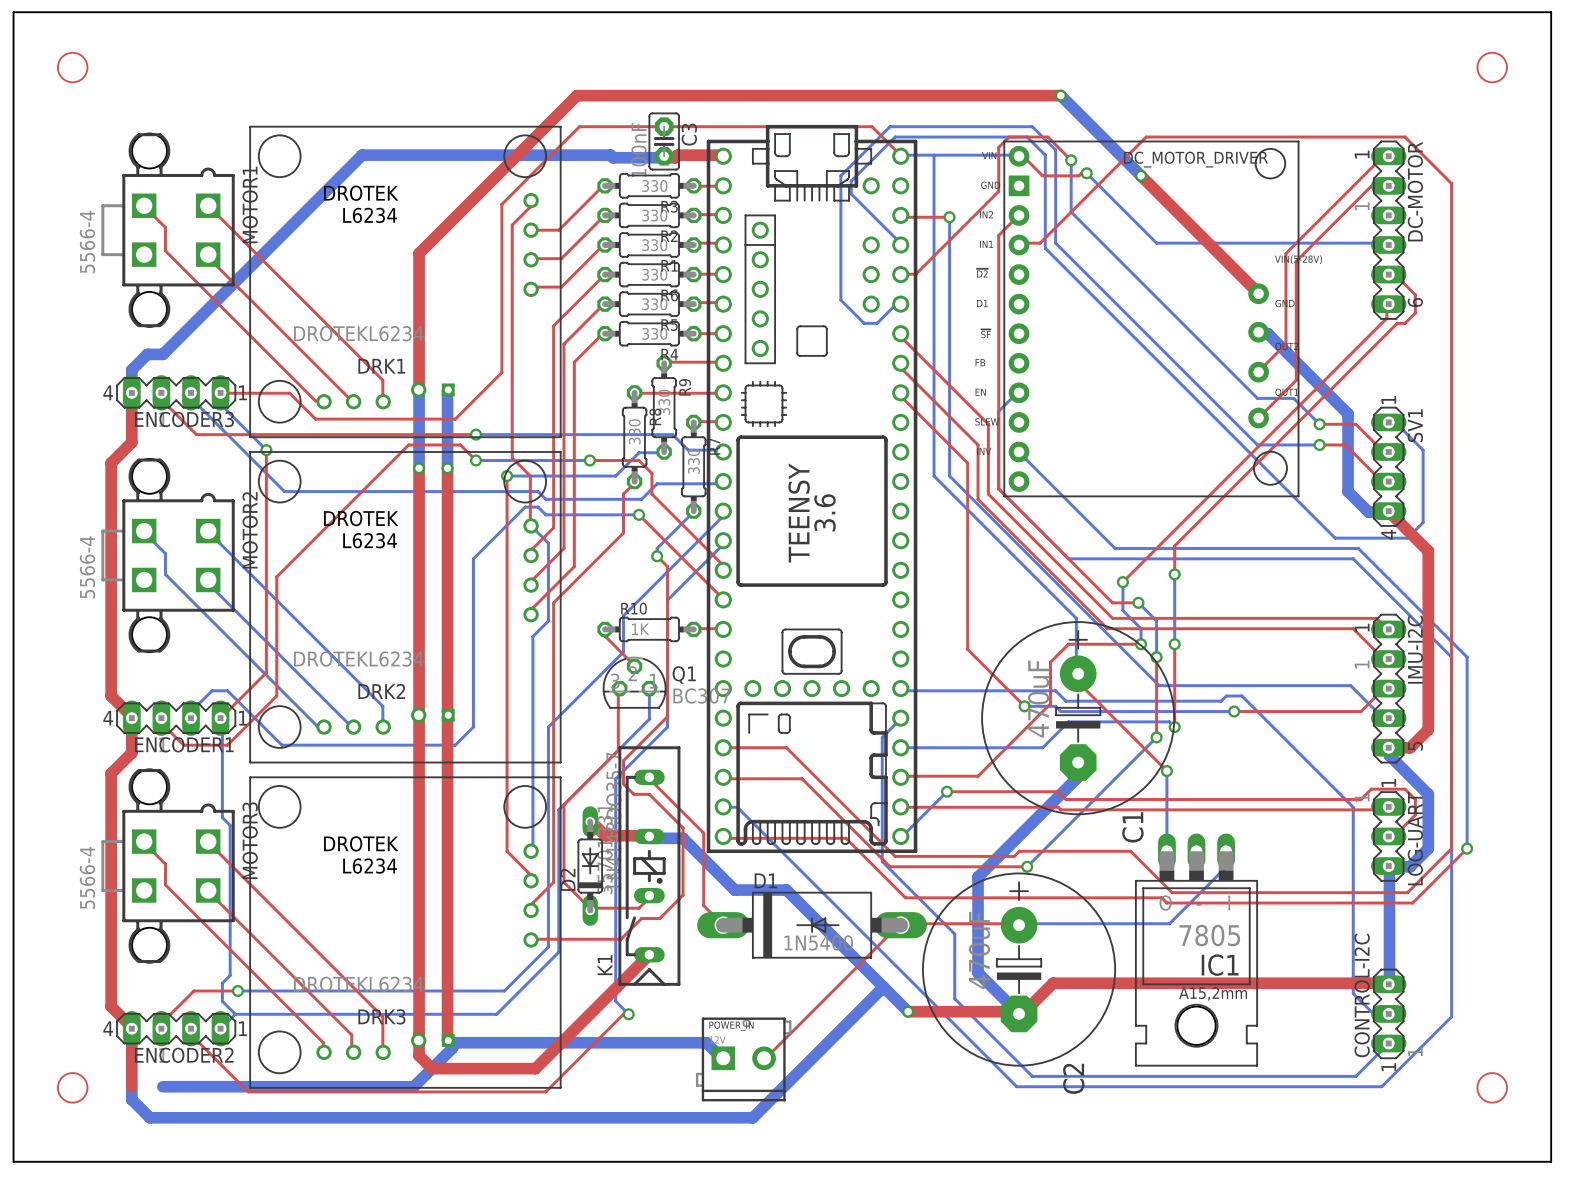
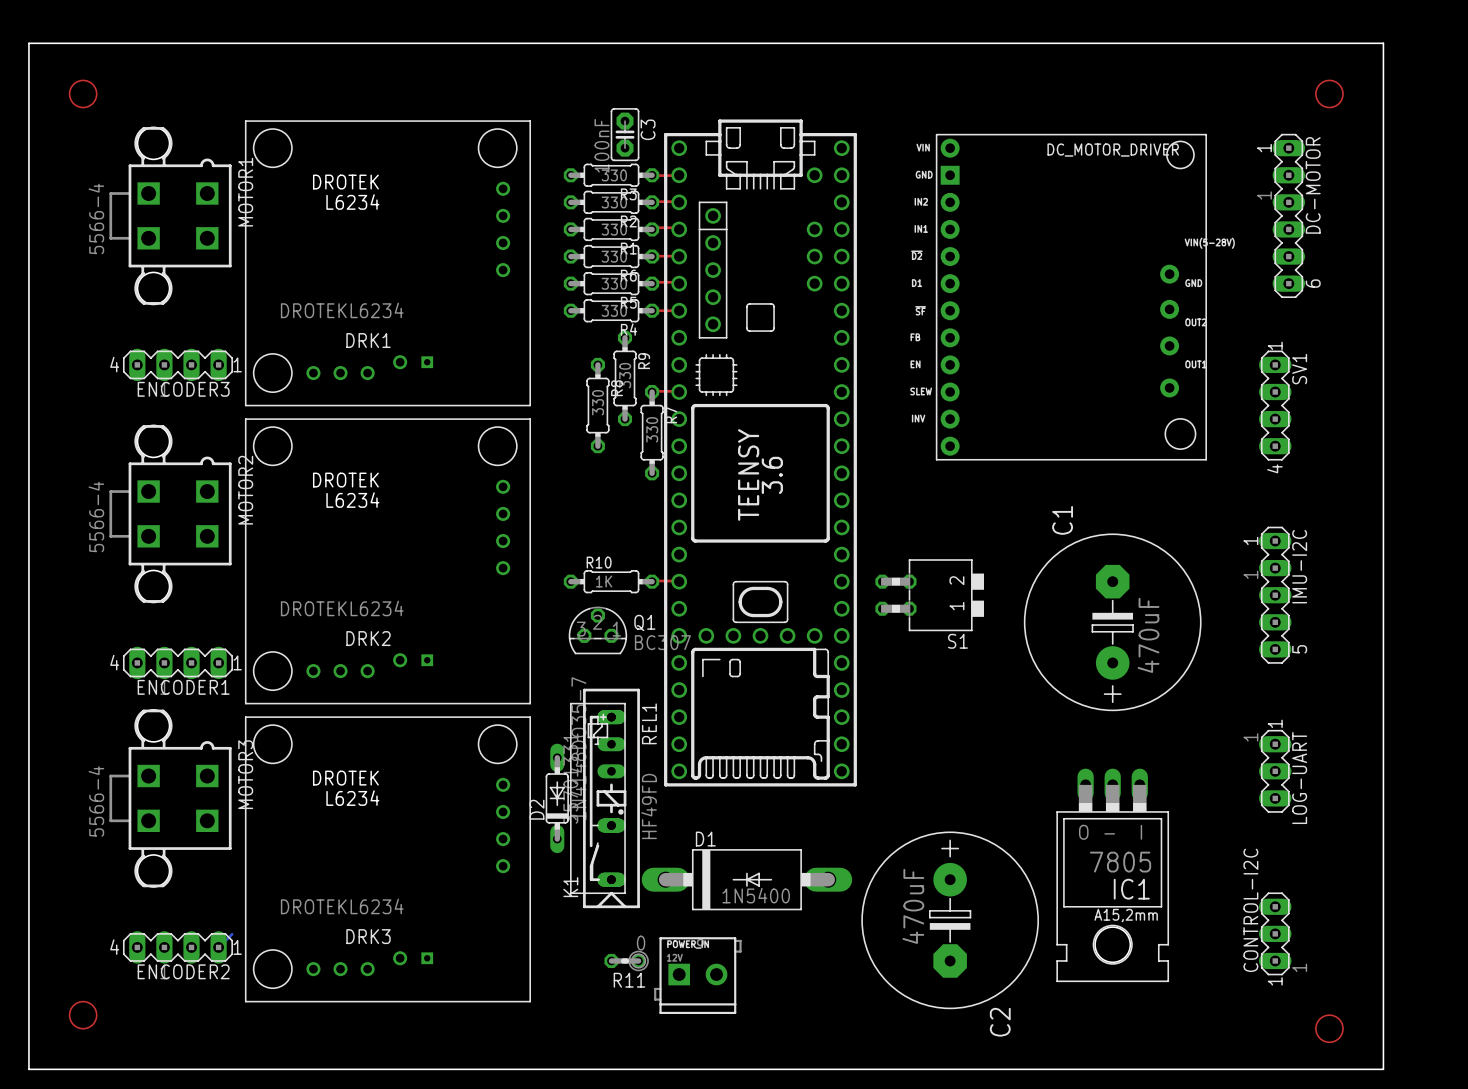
board edge: (13, 41) (13, 12) (1551, 12) (1551, 1161) (1492, 1161) -> (28, 43) (1383, 43) (1383, 1069)
drawing position: (72, 67) -> (83, 93)
drawing position: (1492, 67) -> (1329, 93)
bottom track: (1060, 95) (1141, 175) -> none
top track: (1060, 95) (576, 95) (419, 253) (418, 389) -> none
via: (1060, 95) -> none
bottom track: (934, 155) (934, 476) (1076, 618) (1076, 672) (1078, 673) -> none
bottom track: (664, 156) (613, 157) (610, 155) (362, 155) (162, 354) (147, 354) (131, 369) (131, 392) -> none
top track: (664, 156) (723, 156) -> none
bottom track: (900, 156) (1019, 156) -> none
top track: (900, 156) (871, 126) (579, 126) (501, 204) (501, 372) (455, 419) (315, 419) (289, 393) (220, 392) -> none
top track: (1019, 156) (1024, 157) (1042, 175) (1078, 175) (1081, 173) (1086, 173) -> none
top track: (1388, 156) (1381, 157) (1285, 253) (1285, 344) (1258, 372) -> none
bottom track: (1071, 160) (1071, 212) (1257, 398) (1293, 398) (1319, 424) -> none
top track: (1071, 160) (1047, 137) (1009, 137) (998, 147) (998, 191) (915, 274) (900, 274) -> none
via: (1071, 160) -> none
bottom track: (1086, 173) (1156, 243) (1386, 243) (1388, 244) -> none
via: (1086, 173) -> none
top track: (1141, 175) (1258, 293) -> none
via: (1141, 175) -> none
top track: (605, 185) (558, 230) (531, 230) -> none
top track: (1388, 185) (1371, 186) (1296, 261) (1296, 380) (1258, 417) -> none
top track: (531, 200) (530, 206) (512, 225) (512, 457) (530, 476) (531, 525) -> none
top track: (144, 205) (165, 227) (165, 250) (315, 400) (324, 401) -> none
top track: (208, 205) (382, 380) (383, 401) -> none
top track: (605, 215) (561, 258) (531, 259) -> none
top track: (900, 215) (902, 217) (949, 217) -> none
top track: (1019, 215) (998, 235) (998, 488) (1112, 602) (1138, 602) -> none
bottom track: (949, 217) (949, 476) (1159, 685) (1350, 685) (1381, 716) (1388, 718) -> none
via: (949, 217) -> none
top track: (605, 244) (561, 287) (532, 287) (531, 289) -> none
bottom track: (900, 244) (851, 193) (851, 181) (895, 137) (1027, 137) (1045, 155) (1045, 248) (1335, 538) (1407, 538) (1423, 522) (1423, 450) (1397, 424) (1389, 424) (1388, 422) -> none
top track: (1019, 244) (1019, 243) (1040, 243) (1146, 137) (1405, 137) (1451, 183) (1451, 848) (1407, 892) (1172, 892) (1130, 851) (1019, 851) (1014, 856) (895, 856) (786, 747) (723, 747) -> none
top track: (208, 254) (206, 256) (353, 401) -> none
top track: (605, 274) (553, 325) (553, 527) (532, 548) (531, 555) -> none
top track: (1388, 274) (1389, 276) (1397, 276) (1415, 294) (1415, 313) (1405, 323) (1397, 323) (1174, 545) (1174, 574) -> none
top track: (605, 304) (563, 344) (563, 548) (532, 579) (532, 584) (531, 585) -> none
bottom track: (900, 304) (895, 305) (877, 323) (864, 323) (840, 300) (840, 175) (890, 126) (1032, 126) (1055, 149) (1055, 243) (1257, 444) (1319, 444) -> none
top track: (1388, 304) (1386, 305) (1386, 318) (1122, 582) -> none
bottom track: (1258, 332) (1267, 333) (1348, 413) (1348, 491) (1368, 512) (1388, 511) -> none
top track: (605, 333) (602, 333) (574, 362) (574, 566) (532, 608) (531, 614) -> none
top track: (900, 333) (902, 333) (902, 338) (988, 424) (988, 494) (1112, 618) (1376, 618) (1388, 629) -> none
top track: (664, 363) (723, 363) -> none
top track: (900, 363) (902, 364) (902, 369) (978, 444) (978, 499) (1107, 628) (1353, 628) (1381, 657) (1388, 659) -> none
bottom track: (418, 389) (419, 468) -> none
bottom track: (448, 389) (447, 468) -> none
top track: (131, 392) (131, 442) (111, 463) (111, 695) (131, 718) (131, 752) (111, 773) (111, 1006) (131, 1028) (131, 1086) -> none
top track: (161, 392) (162, 400) (196, 434) (476, 434) -> none
bottom track: (190, 392) (191, 398) (284, 491) (538, 491) (545, 499) (641, 499) (657, 483) (721, 483) (723, 481) -> none
bottom track: (220, 392) (222, 393) (222, 406) (266, 450) -> none
top track: (634, 392) (723, 392) -> none
top track: (900, 392) (902, 393) (902, 398) (967, 463) (967, 649) (1024, 706) -> none
bottom track: (1019, 392) (998, 411) (998, 488) (1068, 558) (1353, 558) (1451, 657) (1451, 1016) (1381, 1086) (1016, 1086) (737, 807) (723, 806) -> none
top track: (1319, 424) (1355, 424) (1381, 450) (1388, 452) -> none
via: (1319, 424) -> none
bottom track: (476, 434) (672, 434) (688, 450) (721, 450) (723, 452) -> none
via: (476, 434) -> none
top track: (1319, 444) (1345, 444) (1381, 481) (1388, 481) -> none
via: (1319, 444) -> none
top track: (266, 450) (266, 672) (220, 718) -> none
via: (266, 450) -> none
bottom track: (664, 452) (639, 452) (615, 476) (507, 476) -> none
bottom track: (1019, 452) (1115, 548) (1358, 548) (1467, 657) (1467, 848) -> none
bottom track: (476, 460) (589, 460) -> none
top track: (476, 460) (460, 444) (408, 444) (276, 576) (276, 695) (227, 745) (183, 745) (162, 724) (161, 718) -> none
via: (476, 460) -> none
top track: (589, 460) (639, 460) (651, 473) (651, 494) (721, 564) (723, 570) -> none
via: (589, 460) -> none
SV1 position: (1388, 466) -> (1275, 405)
top track: (419, 468) (419, 1055) (432, 1068) (535, 1068) (649, 954) -> none
via: (419, 468) -> none
top track: (447, 468) (448, 1040) -> none
via: (447, 468) -> none
top track: (507, 476) (507, 851) (530, 874) (531, 880) -> none
via: (507, 476) -> none
top track: (634, 481) (623, 494) (623, 532) (553, 602) (553, 882) (532, 903) (531, 910) -> none
bottom track: (693, 511) (657, 548) (657, 556) -> none
bottom track: (723, 511) (721, 517) (623, 615) (623, 652) (548, 727) (548, 947) (504, 990) (237, 990) -> none
top track: (1388, 511) (1428, 551) (1428, 729) (1410, 747) (1388, 747) -> none
bottom track: (639, 514) (545, 514) (538, 507) (525, 507) (473, 558) (473, 727) (455, 745) (281, 745) (227, 690) (212, 690) (191, 711) (190, 718) -> none
top track: (639, 514) (723, 599) -> none
via: (639, 514) -> none
bottom track: (531, 525) (548, 543) (548, 620) (532, 636) (532, 851) (531, 851) -> none
bottom track: (144, 531) (165, 553) (165, 574) (318, 727) (324, 727) -> none
bottom track: (208, 531) (382, 706) (383, 727) -> none
bottom track: (723, 540) (721, 545) (667, 600) (667, 727) (615, 778) (615, 1001) (628, 1014) -> none
top track: (657, 556) (667, 566) (667, 716) (623, 760) (623, 783) (633, 794) (649, 794) (683, 827) (683, 895) (659, 918) (641, 918) (620, 939) (531, 939) -> none
via: (657, 556) -> none
bottom track: (1174, 574) (1174, 644) -> none
via: (1174, 574) -> none
bottom track: (208, 579) (206, 582) (353, 727) -> none
bottom track: (1122, 582) (1122, 610) (1141, 628) (1141, 644) -> none
via: (1122, 582) -> none
bottom track: (1138, 602) (1156, 620) (1156, 657) -> none
via: (1138, 602) -> none
top track: (605, 629) (605, 636) (634, 666) -> none
S1: none -> (929, 595)
top track: (1141, 644) (1068, 644) (1050, 662) (1050, 703) (978, 776) (900, 777) -> none
via: (1141, 644) -> none
top track: (1174, 644) (1174, 727) -> none
via: (1174, 644) -> none
top track: (1156, 657) (1156, 737) -> none
via: (1156, 657) -> none
top track: (1078, 673) (1078, 683) (1166, 771) -> none
top track: (619, 688) (618, 750) (563, 804) (563, 882) (590, 910) (592, 908) (639, 908) (649, 895) -> none
bottom track: (649, 688) (649, 719) (558, 809) (558, 952) (496, 1014) (235, 1014) (222, 1001) (222, 983) (230, 975) (230, 825) (222, 817) (222, 719) (220, 718) -> none
bottom track: (900, 688) (902, 690) (1055, 690) (1066, 701) (1221, 701) (1226, 695) (1241, 695) (1353, 807) (1353, 993) (1371, 1011) (1386, 1011) (1388, 1013) -> none
top track: (1388, 688) (1386, 690) (1381, 690) (1361, 711) (1234, 711) -> none
IMU-I2C position: (1388, 688) -> (1275, 595)
bottom track: (1024, 706) (1055, 706) (1060, 711) (1234, 711) -> none
via: (1024, 706) -> none
via: (1234, 711) -> none
bottom track: (900, 718) (882, 737) (882, 861) (954, 934) (954, 998) (1032, 1076) (1355, 1076) (1388, 1043) -> none
C1 rotation: 0° (1078, 718) -> 180° (1112, 622)
C1 position: (1078, 718) -> (1112, 622)
bottom track: (1174, 727) (1169, 721) (1068, 721) (1042, 747) (900, 747) -> none
via: (1174, 727) -> none
bottom track: (1156, 737) (1027, 866) -> none
via: (1156, 737) -> none
bottom track: (1388, 747) (1389, 755) (1428, 794) (1428, 848) (1410, 866) (1388, 866) (1388, 984) -> none
bottom track: (1078, 762) (1076, 763) (1076, 778) (978, 877) (978, 972) (1019, 1013) -> none
bottom track: (1166, 771) (1166, 851) -> none
via: (1166, 771) -> none
top track: (649, 777) (703, 833) (703, 905) (723, 925) -> none
top track: (723, 777) (802, 778) (890, 866) (1027, 866) -> none
bottom track: (946, 791) (900, 836) -> none
top track: (946, 791) (1058, 791) (1066, 799) (1361, 799) (1371, 789) (1405, 789) (1415, 799) (1415, 815) (1394, 835) (1388, 836) -> none
via: (946, 791) -> none
top track: (900, 806) (1058, 807) (1060, 809) (1384, 809) (1388, 806) -> none
top track: (590, 821) (605, 835) (649, 836) -> none
bottom track: (649, 836) (649, 838) (683, 838) (734, 890) (786, 890) (908, 1011) -> none
top track: (723, 836) (724, 838) (846, 838) (905, 897) (1161, 897) (1166, 903) (1412, 903) (1467, 848) -> none
LOG-UART position: (1388, 836) -> (1275, 771)
top track: (144, 841) (165, 864) (165, 884) (323, 1042) (324, 1052) -> none
top track: (208, 841) (382, 1016) (383, 1052) -> none
via: (1467, 848) -> none
bottom track: (1226, 851) (1223, 851) (1223, 869) (1169, 923) (1019, 925) -> none
REL1: none -> HF49FD (597, 798)
via: (1027, 866) -> none
top track: (208, 890) (351, 1034) (351, 1050) (353, 1052) -> none
D1 position: (812, 925) -> (746, 879)
top track: (1019, 925) (900, 923) (764, 1058) -> none
C2 position: (1019, 969) -> (950, 920)
top track: (1388, 984) (1053, 983) (1024, 1011) (1019, 1013) (1016, 1011) (908, 1011) -> none
bottom track: (883, 987) (752, 1117) (149, 1117) (131, 1099) (131, 1089) -> none
top track: (237, 990) (193, 990) (162, 1022) (161, 1028) -> none
via: (237, 990) -> none
via: (908, 1011) -> none
CONTROL-I2C position: (1388, 1013) -> (1275, 933)
top track: (628, 1014) (623, 1014) (545, 1091) (248, 1091) (191, 1034) (190, 1028) -> none
via: (628, 1014) -> none
bottom track: (448, 1040) (450, 1042) (706, 1042) (723, 1058) -> none
bottom track: (452, 1042) (452, 1047) (413, 1086) (162, 1086) -> none
R11: none -> 0 (626, 960)
drawing position: (72, 1087) -> (83, 1015)
drawing position: (1492, 1087) -> (1329, 1028)

